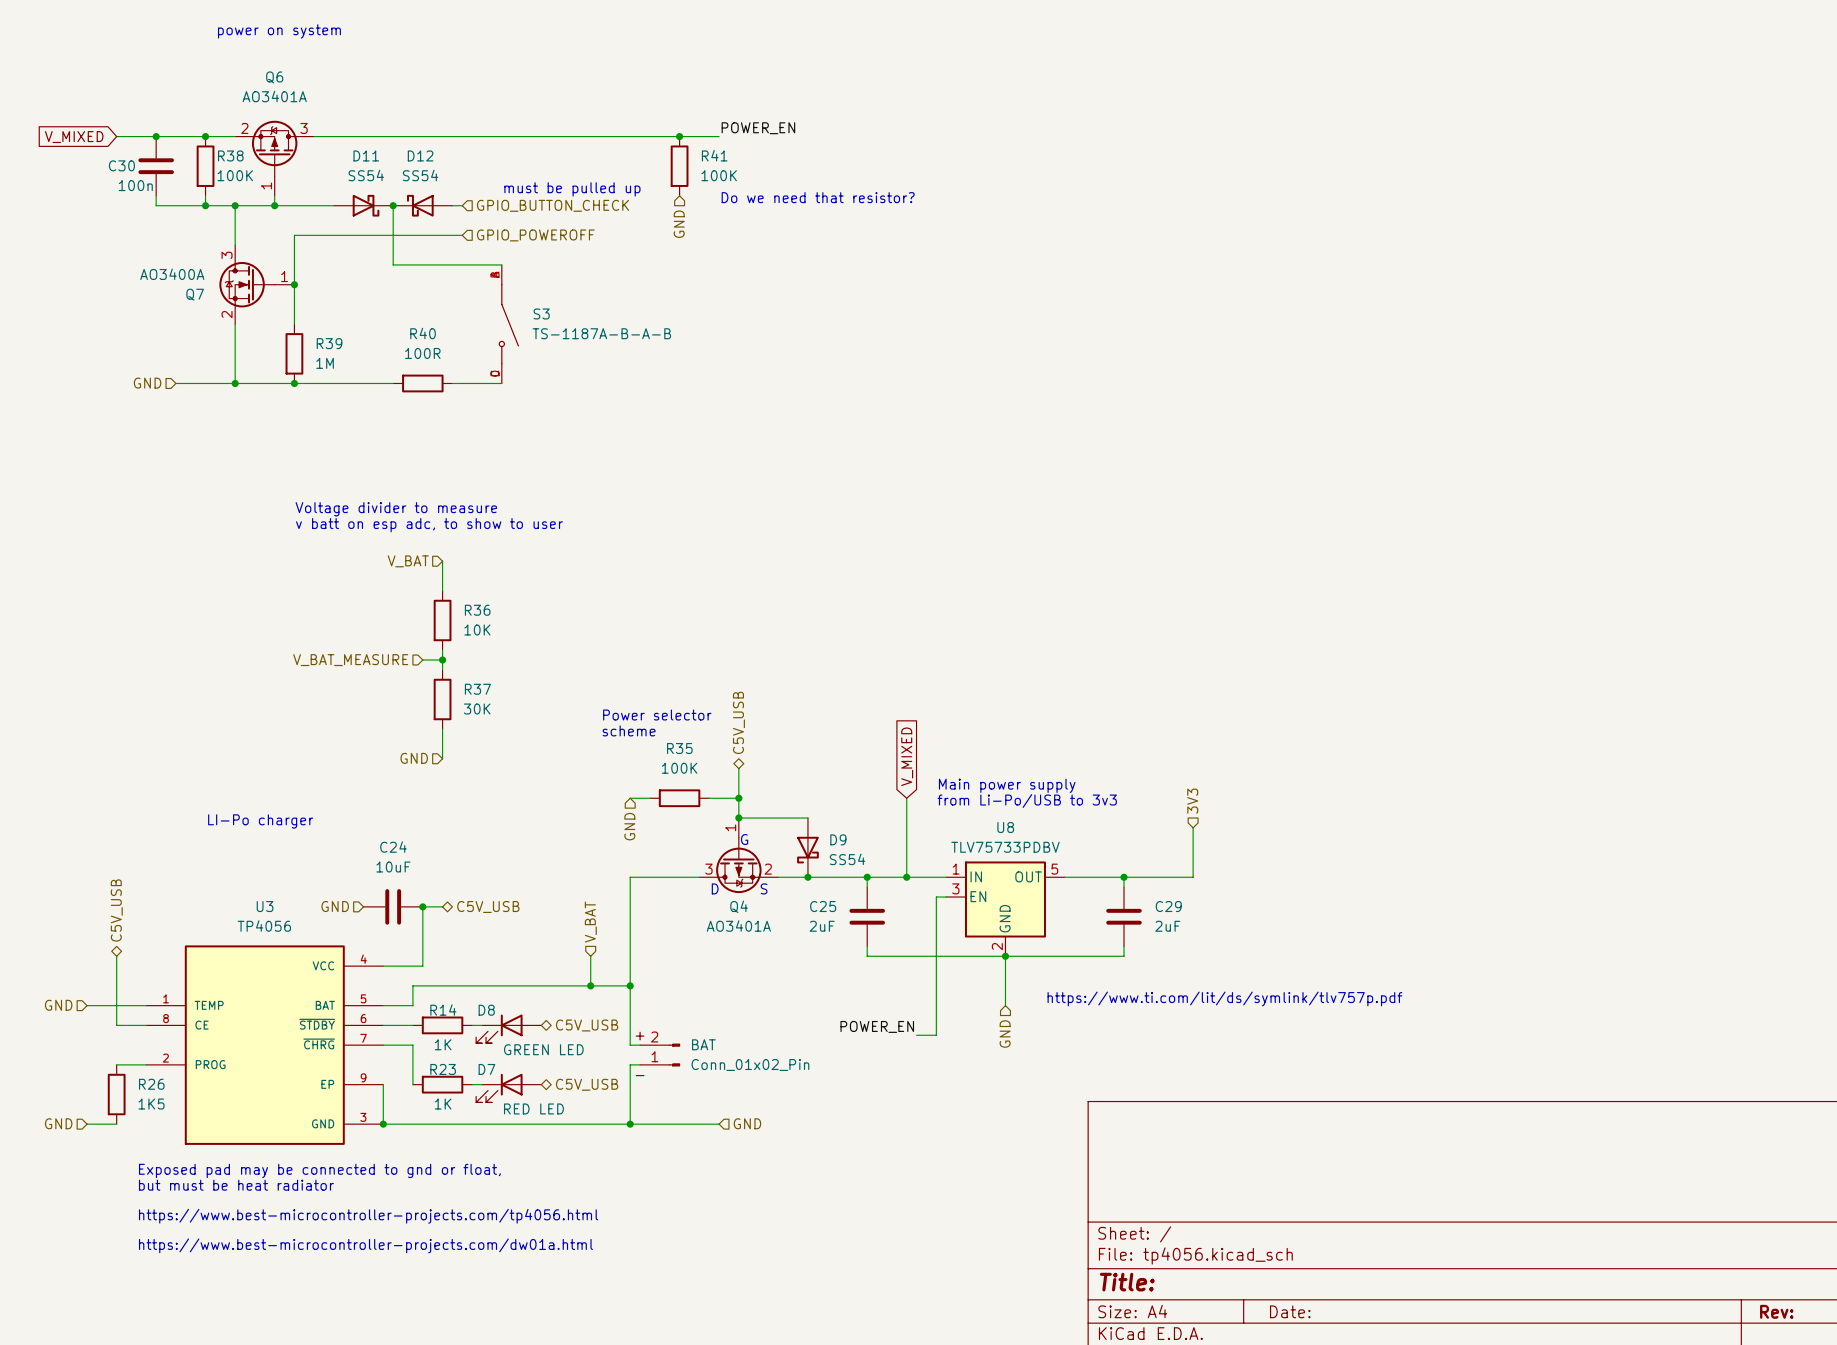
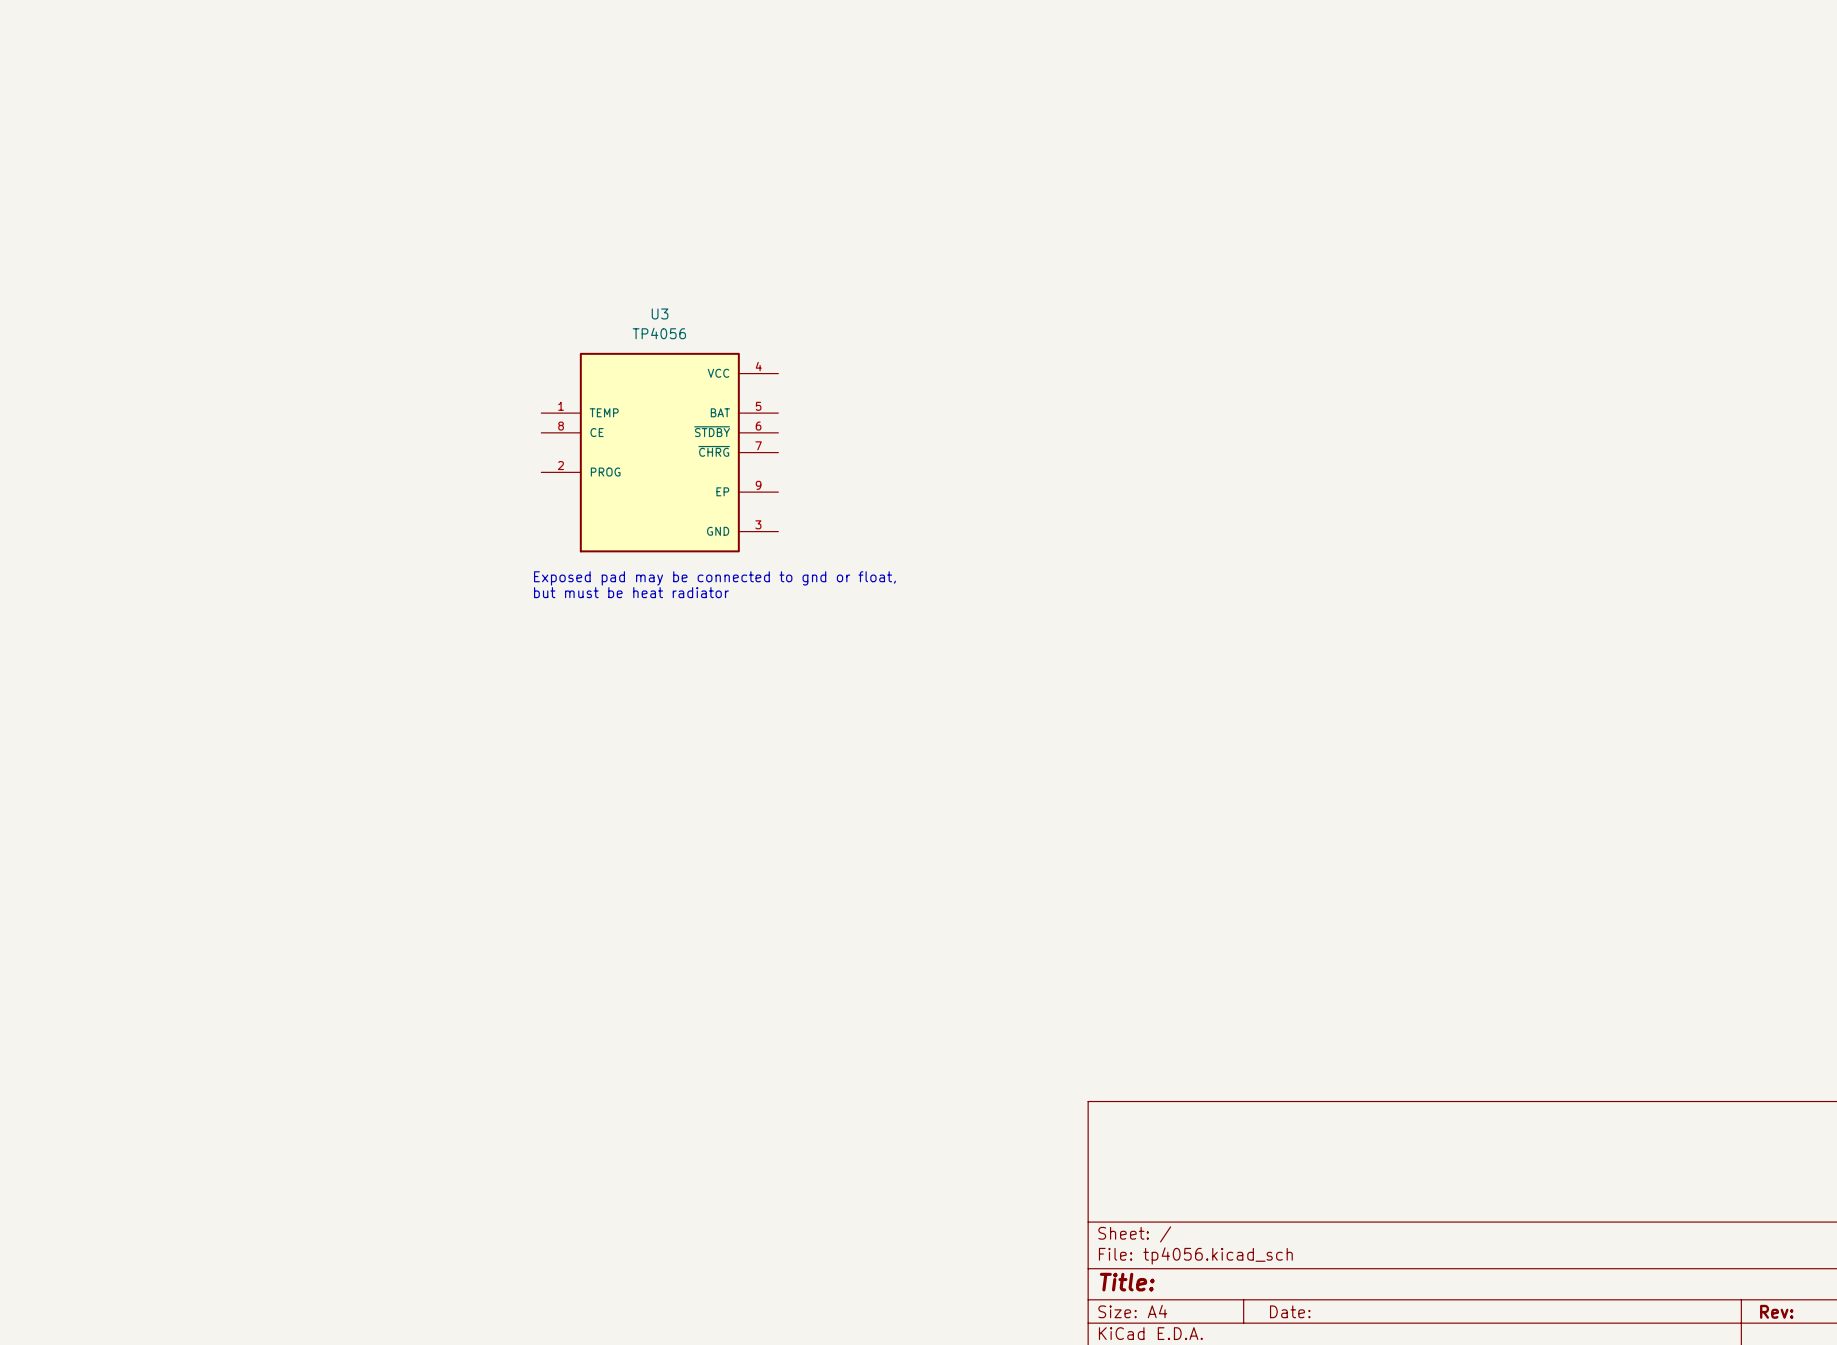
text: power on system (279, 31) -> none
label: POWER_EN (758, 128) -> none
wire: (116, 136) (235, 136) -> none
junction: (156, 136) -> none
junction: (205, 136) -> none
wire: (314, 136) (719, 136) -> none
junction: (679, 136) -> none
global label: V_MIXED (74, 137) -> none
Q6: AO3401A (274, 158) -> none
C30: 100n (156, 166) -> none
R38: 100K (205, 166) -> none
R41: 100K (679, 166) -> none
text: must be pulled up (572, 189) -> none
wire: (156, 195) (156, 205) (333, 205) -> none
wire: (205, 195) (205, 205) -> none
wire: (274, 195) (274, 205) -> none
text: Do we need that resistor? (818, 197) -> none
junction: (205, 205) -> none
wire: (235, 205) (235, 245) -> none
junction: (235, 205) -> none
junction: (274, 205) -> none
D11: SS54 (363, 205) -> none
wire: (393, 205) (393, 264) (501, 264) -> none
junction: (393, 205) -> none
D12: SS54 (422, 205) -> none
wire: (452, 205) (462, 205) -> none
hierarchical label: GPIO_BUTTON_CHECK (553, 205) -> none
hierarchical label: GND (679, 224) -> none
wire: (462, 235) (294, 235) (294, 324) -> none
hierarchical label: GPIO_POWEROFF (535, 235) -> none
Q7: AO3400A (256, 284) -> none
junction: (294, 284) -> none
wire: (235, 324) (235, 383) -> none
S3: TS-1187A-B-A-B (508, 324) -> none
R39: 1M (294, 353) -> none
hierarchical label: GND (147, 383) -> none
wire: (175, 383) (393, 383) -> none
junction: (235, 383) -> none
junction: (294, 383) -> none
R40: 100R (422, 383) -> none
wire: (452, 383) (501, 383) -> none
text: Voltage divider to measure (396, 509) -> none
text: v batt on esp adc, to show to user (429, 525) -> none
hierarchical label: V_BAT (408, 561) -> none
wire: (442, 561) (442, 590) -> none
text: none -> Exposed pad may be connected to gnd or float, (714, 578)
text: none -> but must be heat radiator (631, 592)
R36: 10K (442, 620) -> none
wire: (442, 650) (442, 669) -> none
hierarchical label: V_BAT_MEASURE (350, 660) -> none
wire: (422, 660) (442, 660) -> none
junction: (442, 660) -> none
R37: 30K (442, 699) -> none
text: Power selector (657, 715) -> none
hierarchical label: C5V_USB (738, 722) -> none
wire: (442, 729) (442, 758) -> none
text: scheme (629, 730) -> none
global label: V_MIXED (907, 756) -> none
hierarchical label: GND (414, 758) -> none
wire: (738, 768) (738, 818) (807, 818) -> none
text: Main power supply (1007, 785) -> none
wire: (630, 798) (649, 798) -> none
R35: 100K (679, 798) -> none
wire: (709, 798) (738, 798) -> none
junction: (738, 798) -> none
wire: (906, 798) (906, 877) -> none
text: from Li-Po/USB to 3v3 (1027, 800) -> none
hierarchical label: 3V3 (1192, 801) -> none
junction: (738, 818) -> none
text: LI-Po charger (260, 821) -> none
hierarchical label: GND (629, 826) -> none
wire: (1193, 827) (1193, 877) (1064, 877) -> none
text: G (744, 839) -> none
D9: SS54 (807, 847) -> none
Q4: AO3401A (738, 855) -> none
wire: (699, 877) (630, 877) (630, 1045) (640, 1045) -> none
wire: (778, 877) (946, 877) -> none
junction: (807, 877) -> none
wire: (867, 877) (867, 887) -> none
junction: (867, 877) -> none
junction: (906, 877) -> none
wire: (1123, 877) (1123, 887) -> none
junction: (1123, 877) -> none
text: D (715, 888) -> none
text: S (764, 888) -> none
wire: (946, 897) (936, 897) (936, 1035) (916, 1035) -> none
hierarchical label: GND (335, 906) -> none
C24: 10uF (393, 906) -> none
junction: (422, 906) -> none
wire: (442, 906) (422, 906) (422, 966) (383, 966) -> none
hierarchical label: C5V_USB (488, 906) -> none
U8: TLV75733PDBV (1005, 908) -> none
hierarchical label: C5V_USB (116, 910) -> none
C25: 2uF (867, 916) -> none
C29: 2uF (1123, 916) -> none
hierarchical label: V_BAT (590, 922) -> none
wire: (867, 946) (867, 956) (1123, 956) (1123, 946) -> none
wire: (116, 956) (116, 1025) (146, 1025) -> none
wire: (590, 956) (590, 985) -> none
wire: (1005, 956) (1005, 1005) -> none
junction: (1005, 956) -> none
junction: (590, 985) -> none
wire: (630, 985) (412, 985) (412, 1005) (383, 1005) -> none
junction: (630, 985) -> none
text: https://www.ti.com/lit/ds/symlink/tlv757p.pdf (1224, 998) -> none
hierarchical label: GND (58, 1005) -> none
wire: (87, 1005) (146, 1005) -> none
wire: (383, 1025) (412, 1025) -> none
R14: 1K (442, 1025) -> none
wire: (472, 1025) (482, 1025) -> none
hierarchical label: C5V_USB (587, 1025) -> none
label: POWER_EN (877, 1026) -> none
D8: GREEN LED (508, 1028) -> none
hierarchical label: GND (1005, 1034) -> none
U3 position: (264, 1045) -> (659, 452)
wire: (383, 1045) (412, 1045) (412, 1084) -> none
BAT: Conn_01x02_Pin (660, 1055) -> none
wire: (116, 1064) (146, 1064) -> none
wire: (640, 1064) (630, 1064) (630, 1124) -> none
wire: (383, 1084) (383, 1124) (719, 1124) -> none
R23: 1K (442, 1084) -> none
wire: (472, 1084) (482, 1084) -> none
hierarchical label: C5V_USB (587, 1084) -> none
D7: RED LED (508, 1088) -> none
R26: 1K5 (116, 1094) -> none
hierarchical label: GND (58, 1123) -> none
hierarchical label: GND (747, 1123) -> none
wire: (87, 1124) (116, 1124) -> none
junction: (383, 1124) -> none
junction: (630, 1124) -> none
text: Exposed pad may be connected to gnd or float, (319, 1170) -> none
text: but must be heat radiator (236, 1185) -> none
text: https://www.best-microcontroller-projects.com/tp4056.html (368, 1216) -> none
text: https://www.best-microcontroller-projects.com/dw01a.html (365, 1245) -> none

